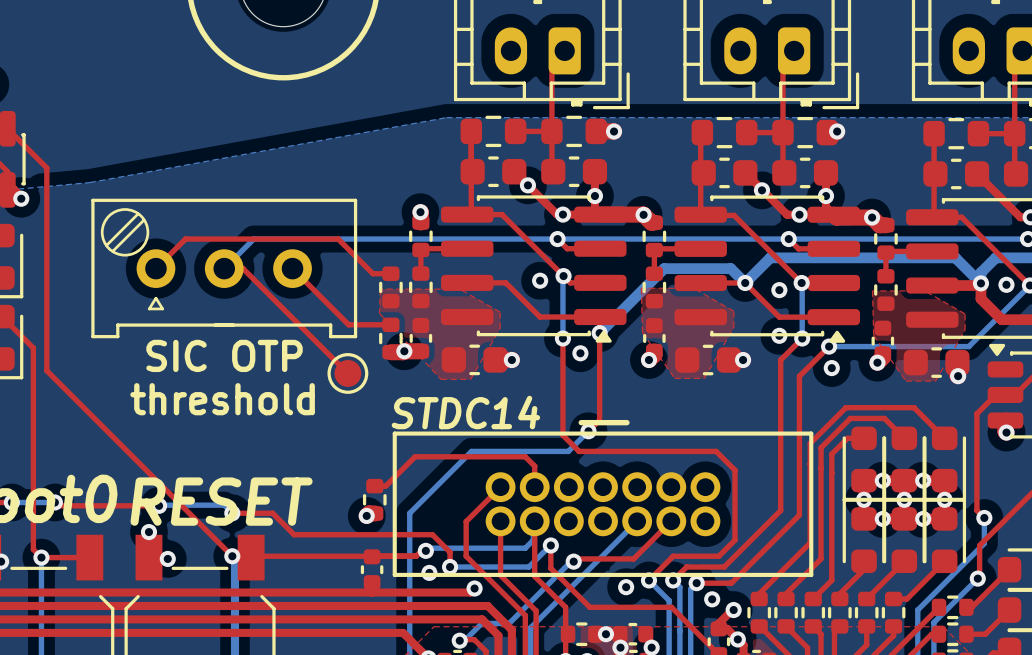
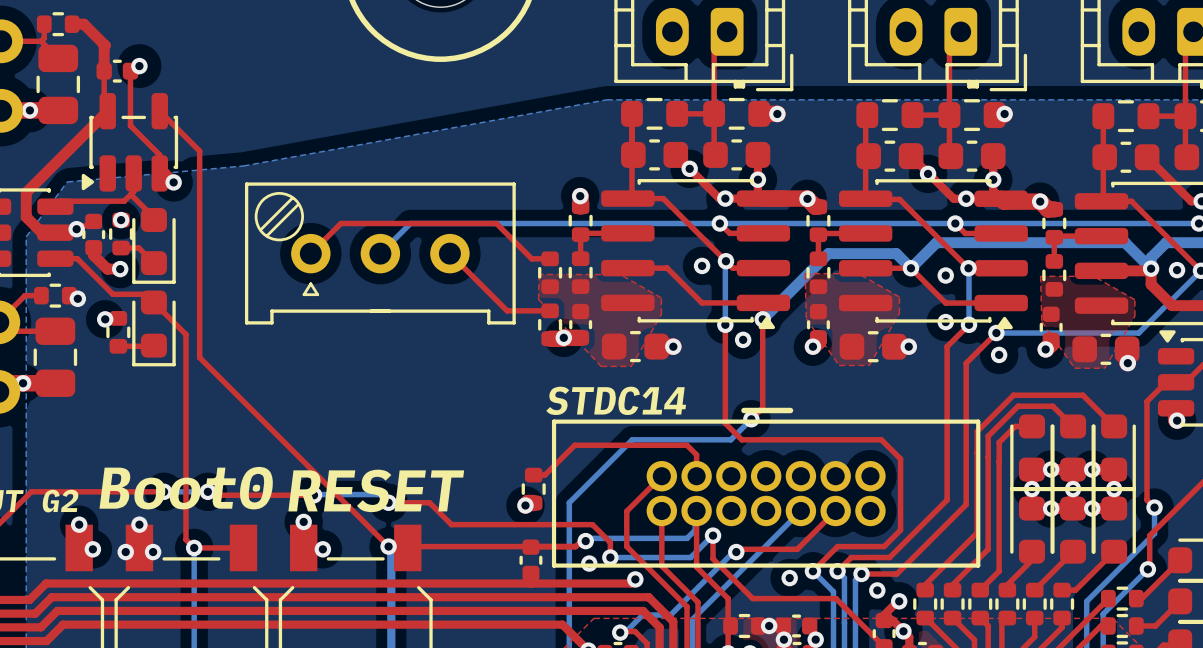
top track: (224, 268) (243, 268) (347, 373) -> none
text: SIC OTP (224, 355) -> none
part: (347, 373) -> none
text: threshold (222, 399) -> none

